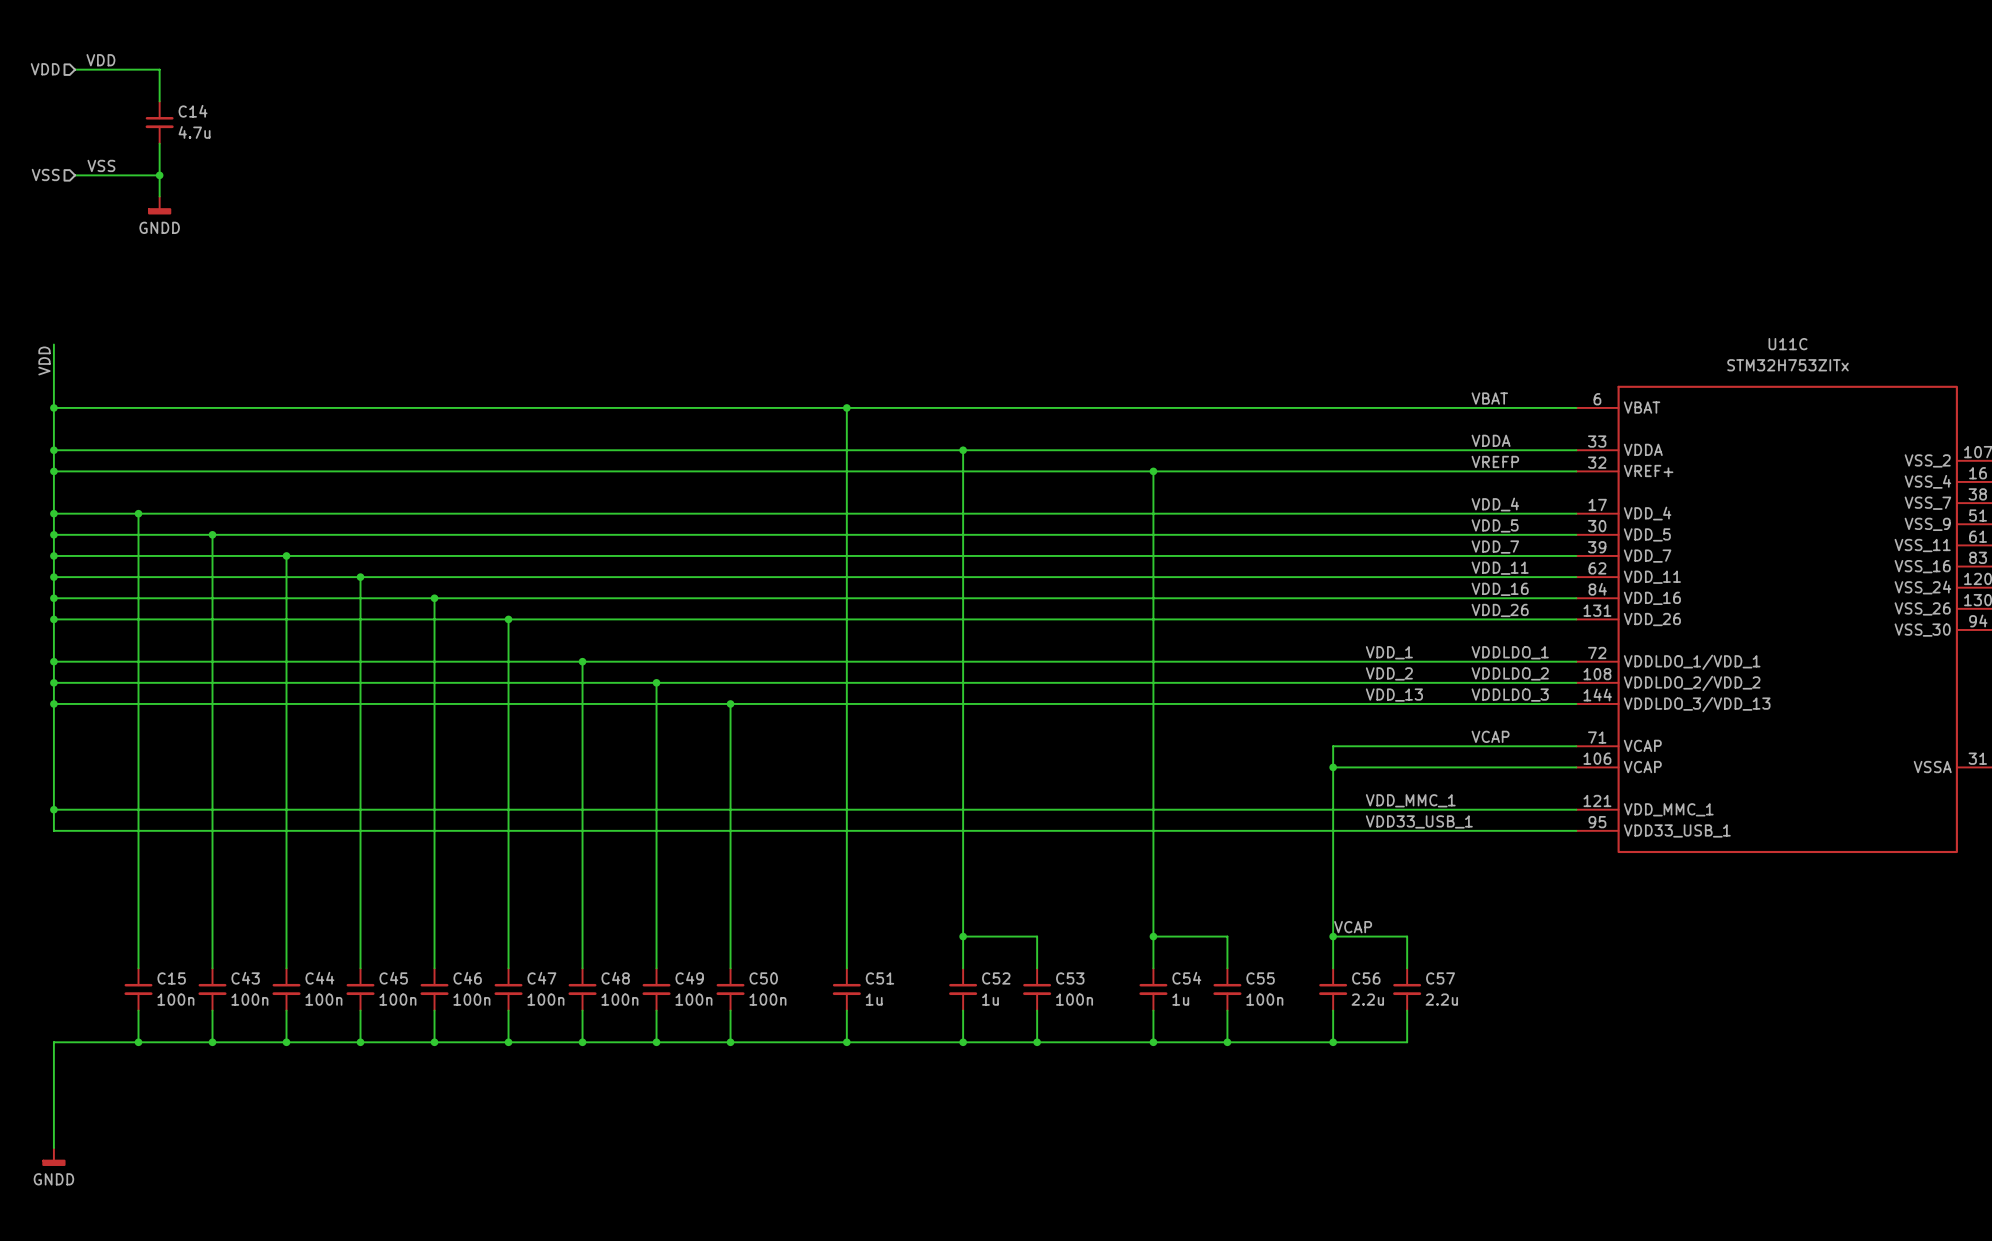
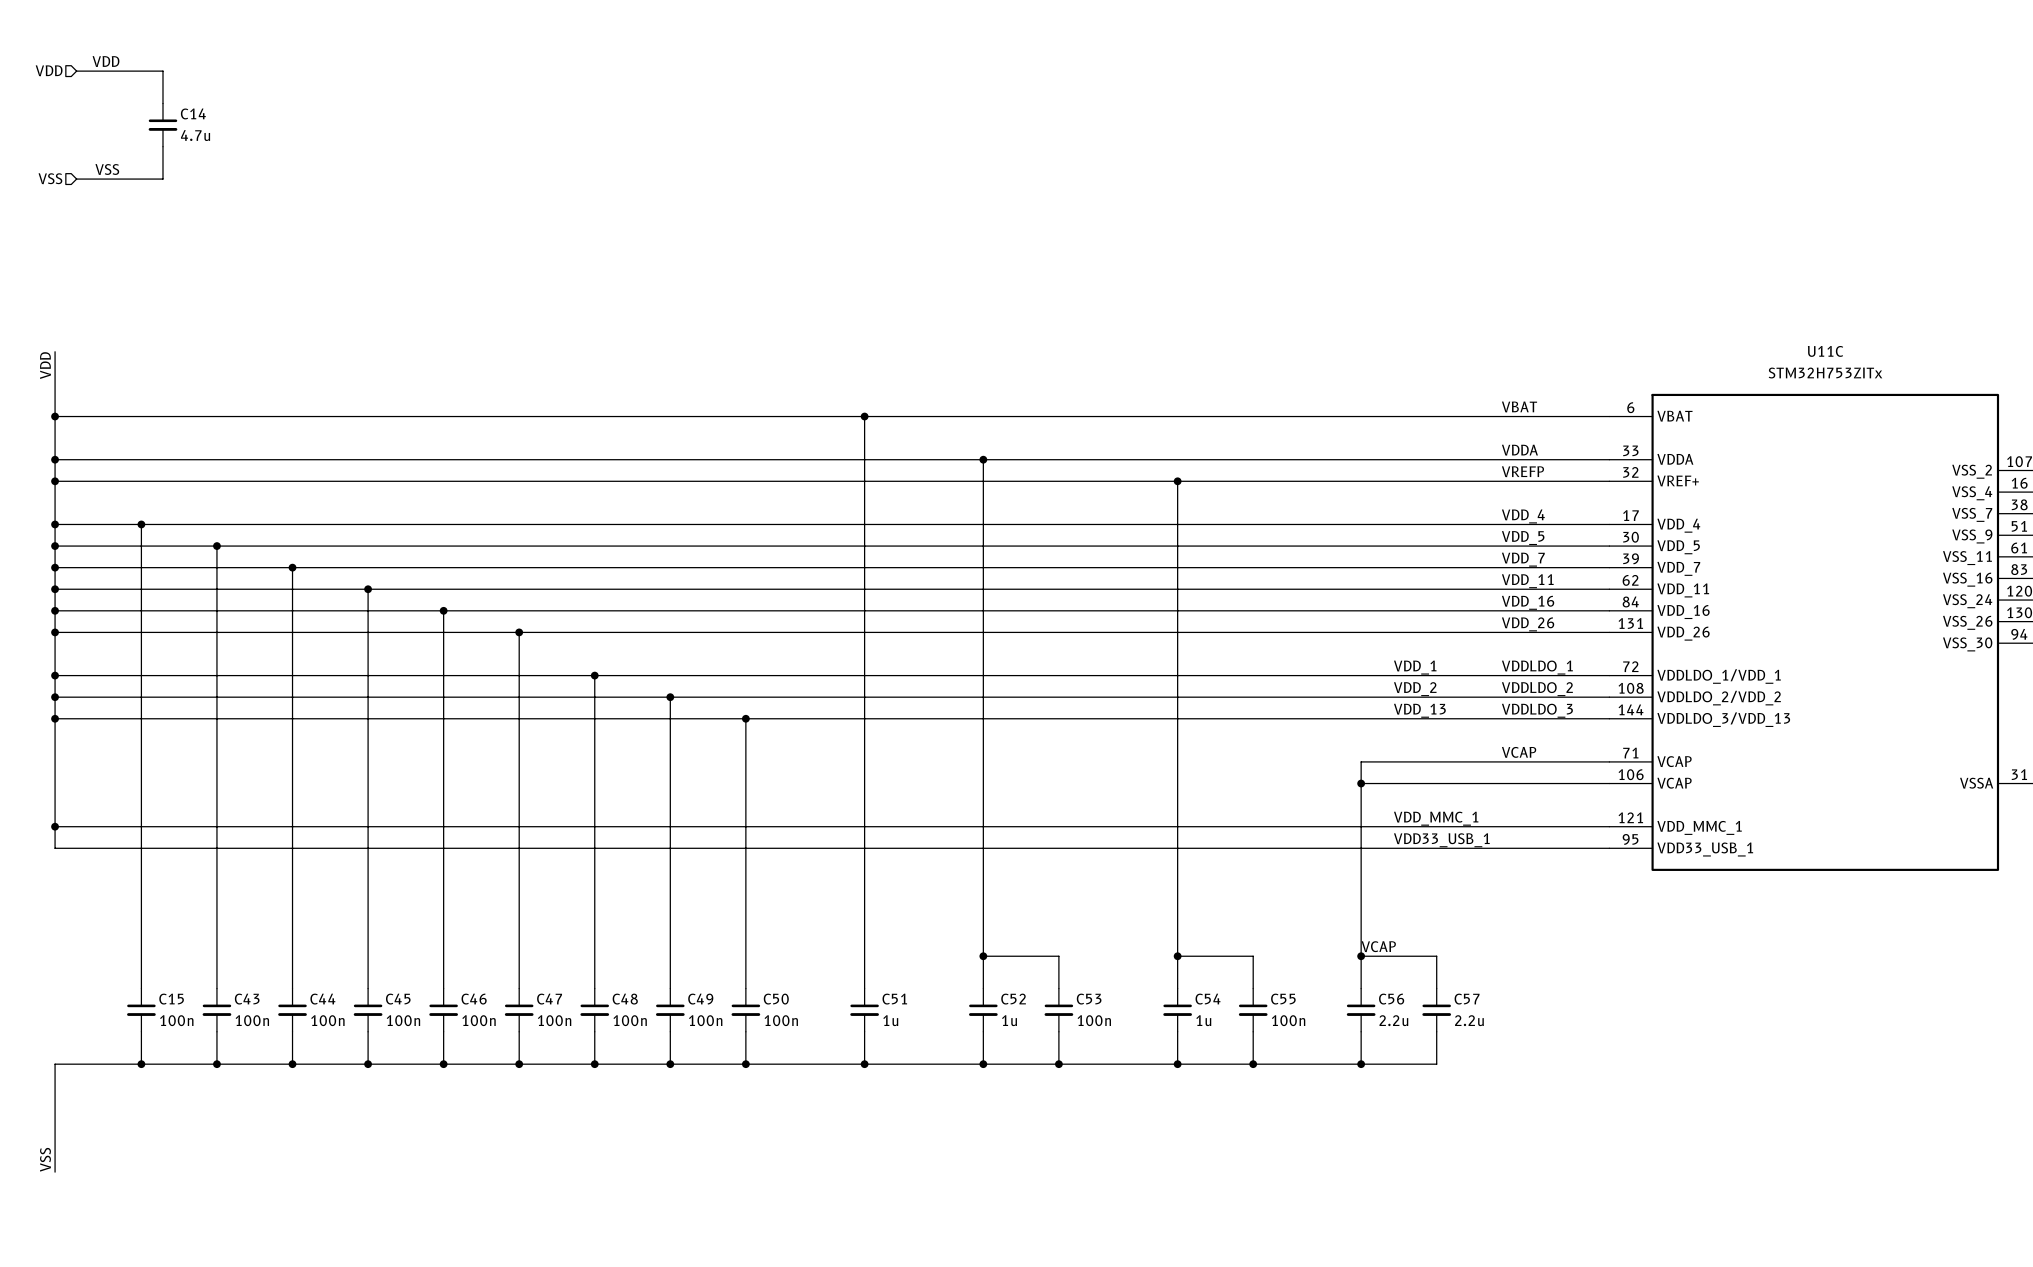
wire: (159, 175) (159, 196) -> none
junction: (159, 175) -> none
power symbol: GNDD (159, 205) -> none
label: none -> VSS (45, 1159)
power symbol: GNDD (53, 1157) -> none

